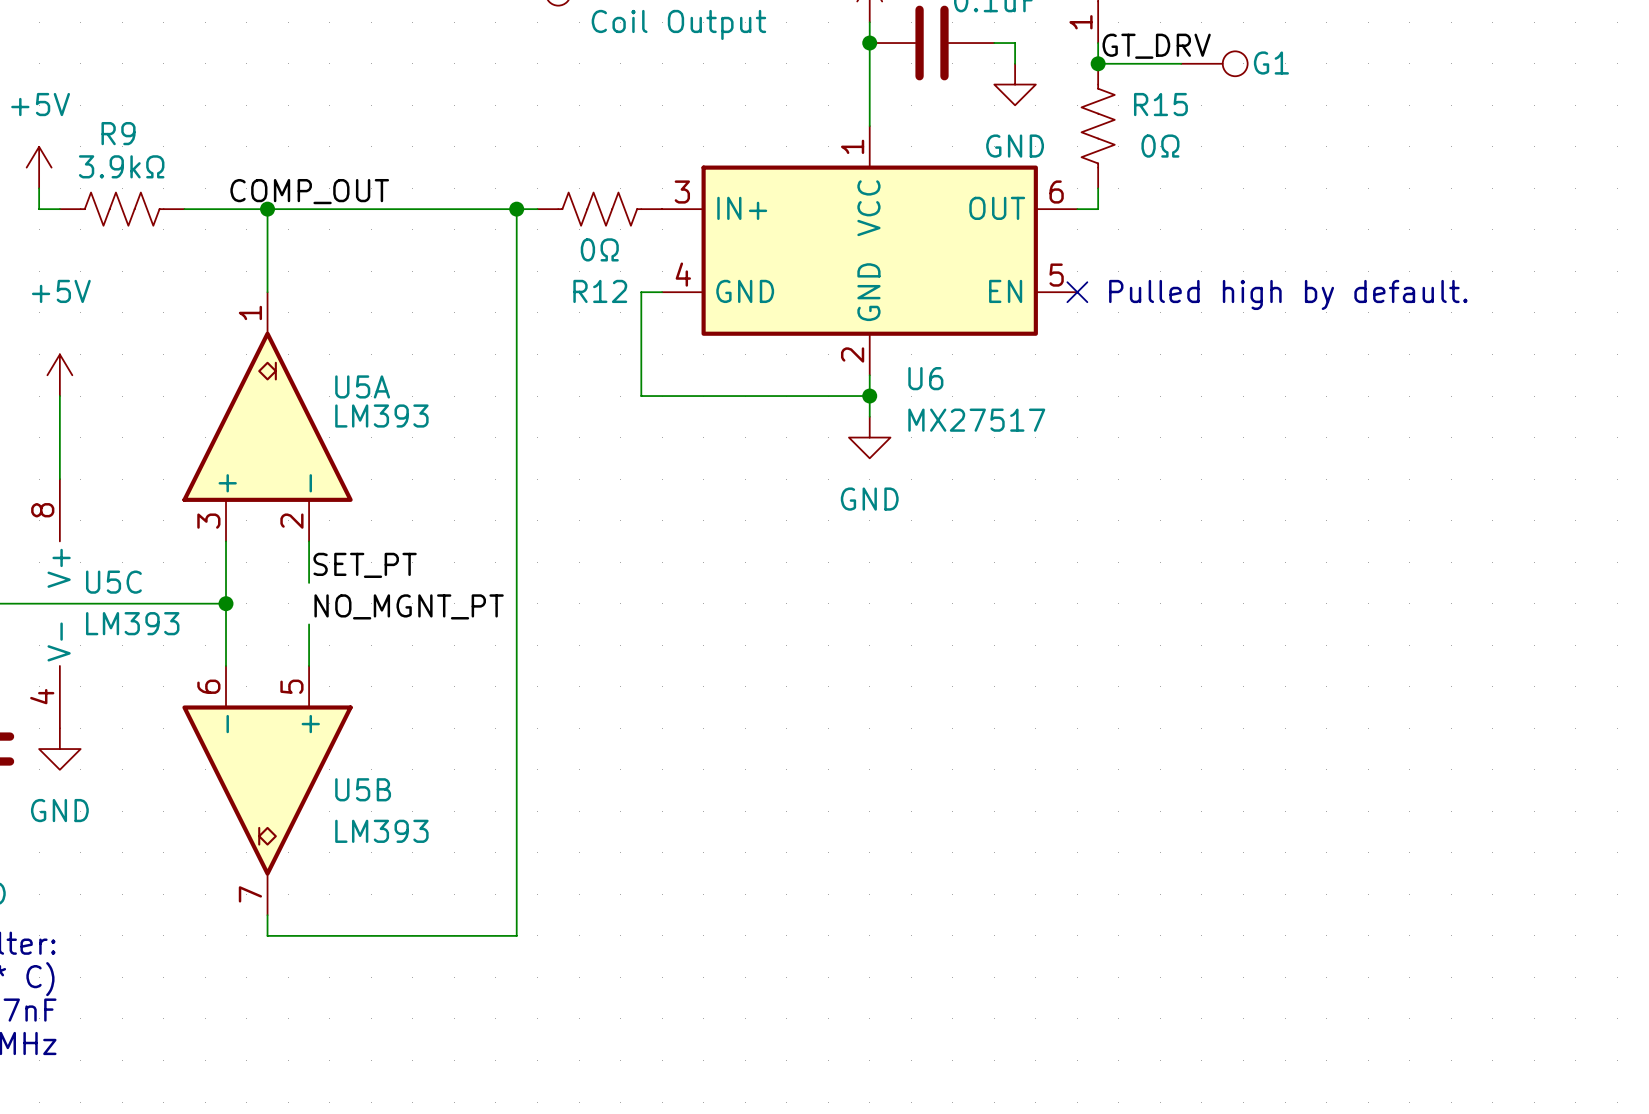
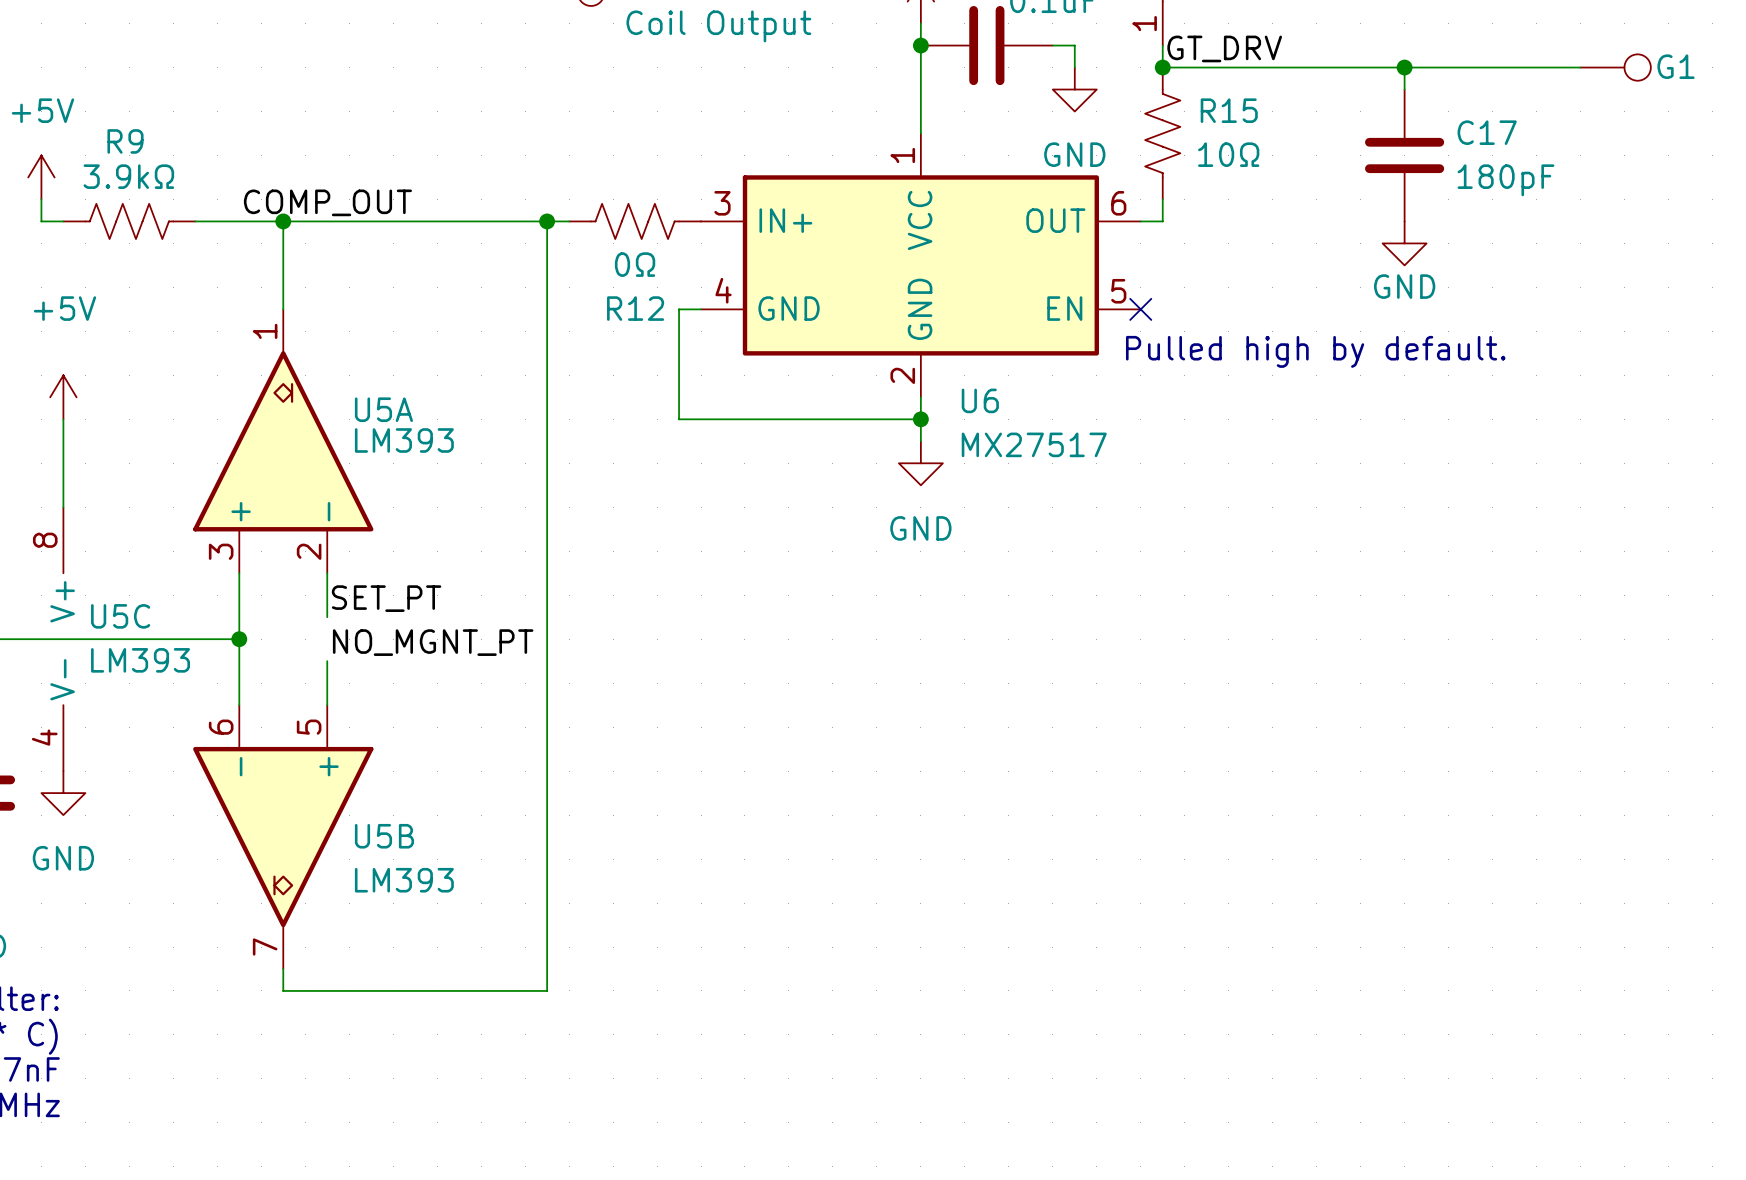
wire: none -> (1250, 67) (1580, 67)
G1 position: (1214, 63) -> (1615, 67)
wire: none -> (1404, 67) (1404, 89)
junction: none -> (1404, 67)
R15 value: 0Ω (1160, 146) -> 10Ω (1228, 154)
C17: none -> 180pF (1404, 155)
power symbol: none -> GND (1404, 243)
text position: Pulled high by default. (1288, 294) -> Pulled high by default. (1315, 351)

